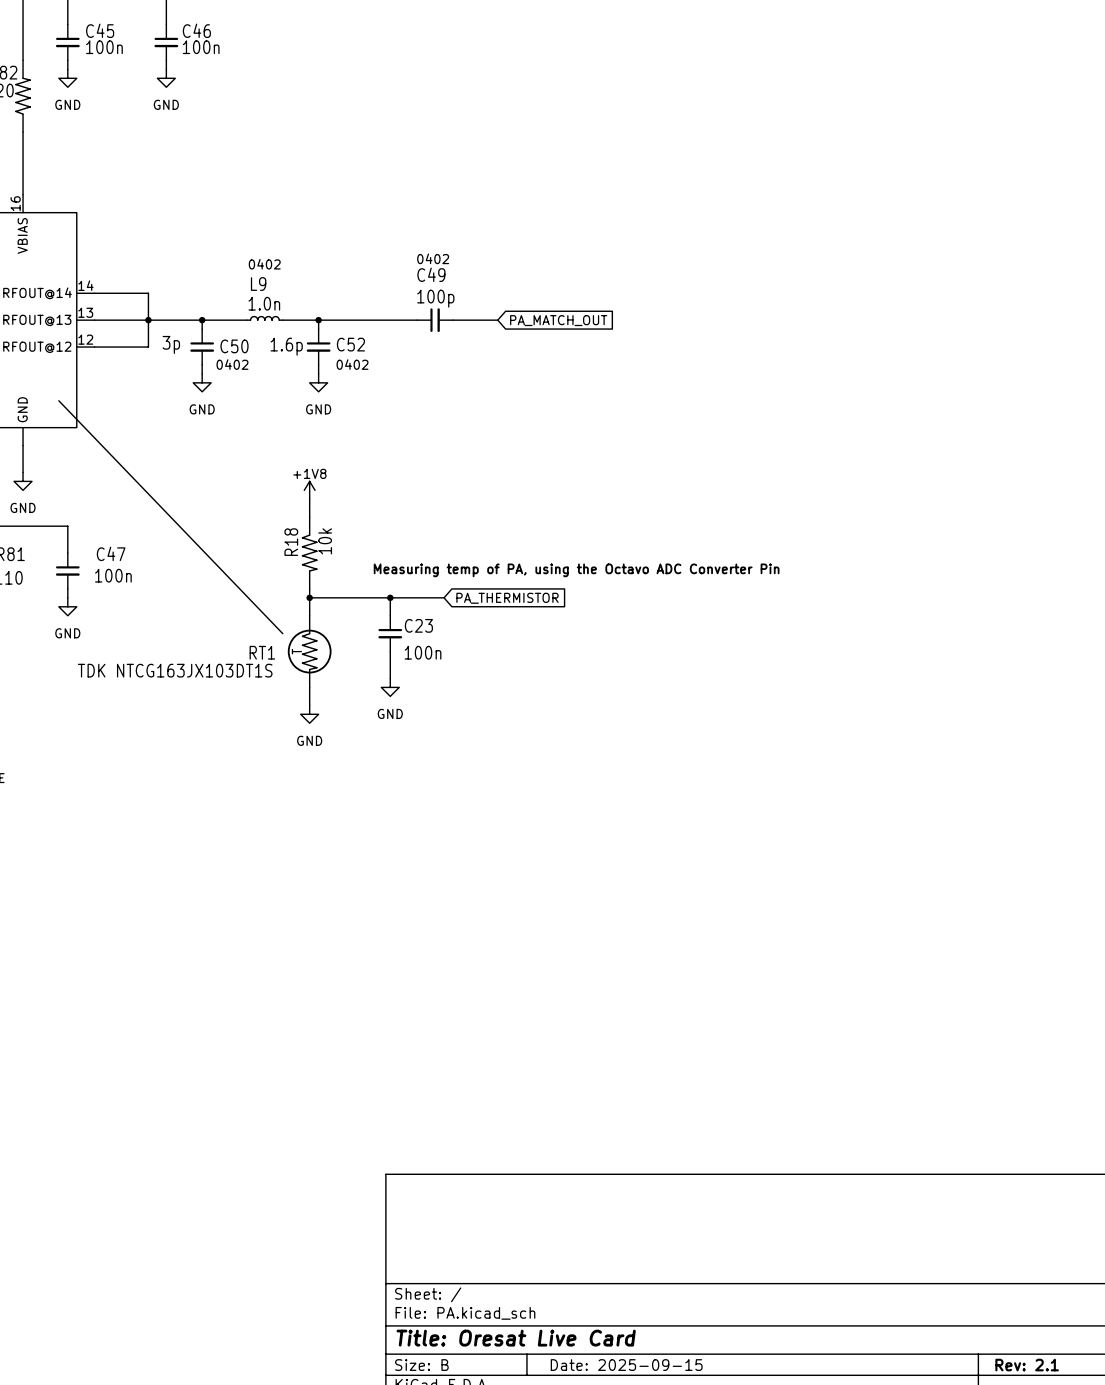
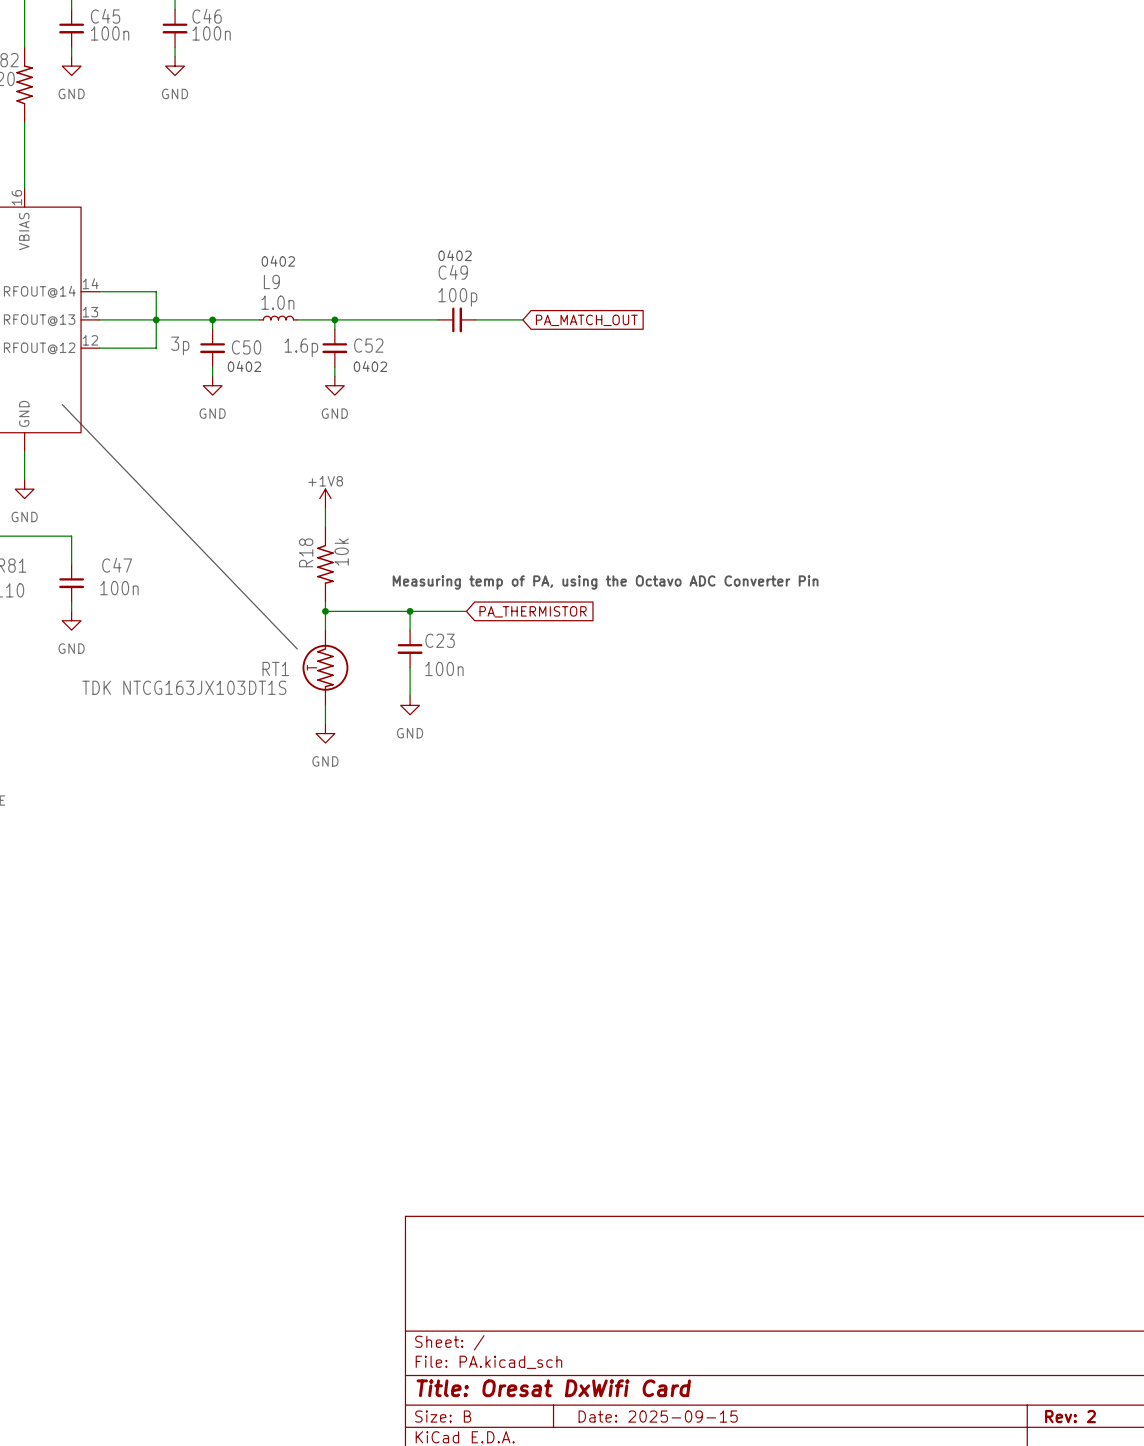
title block: Title: Oresat Live Card (516, 1338) -> Title: Oresat DxWifi Card (553, 1388)
title block: Rev: 2.1 (1027, 1365) -> Rev: 2 (1070, 1416)

